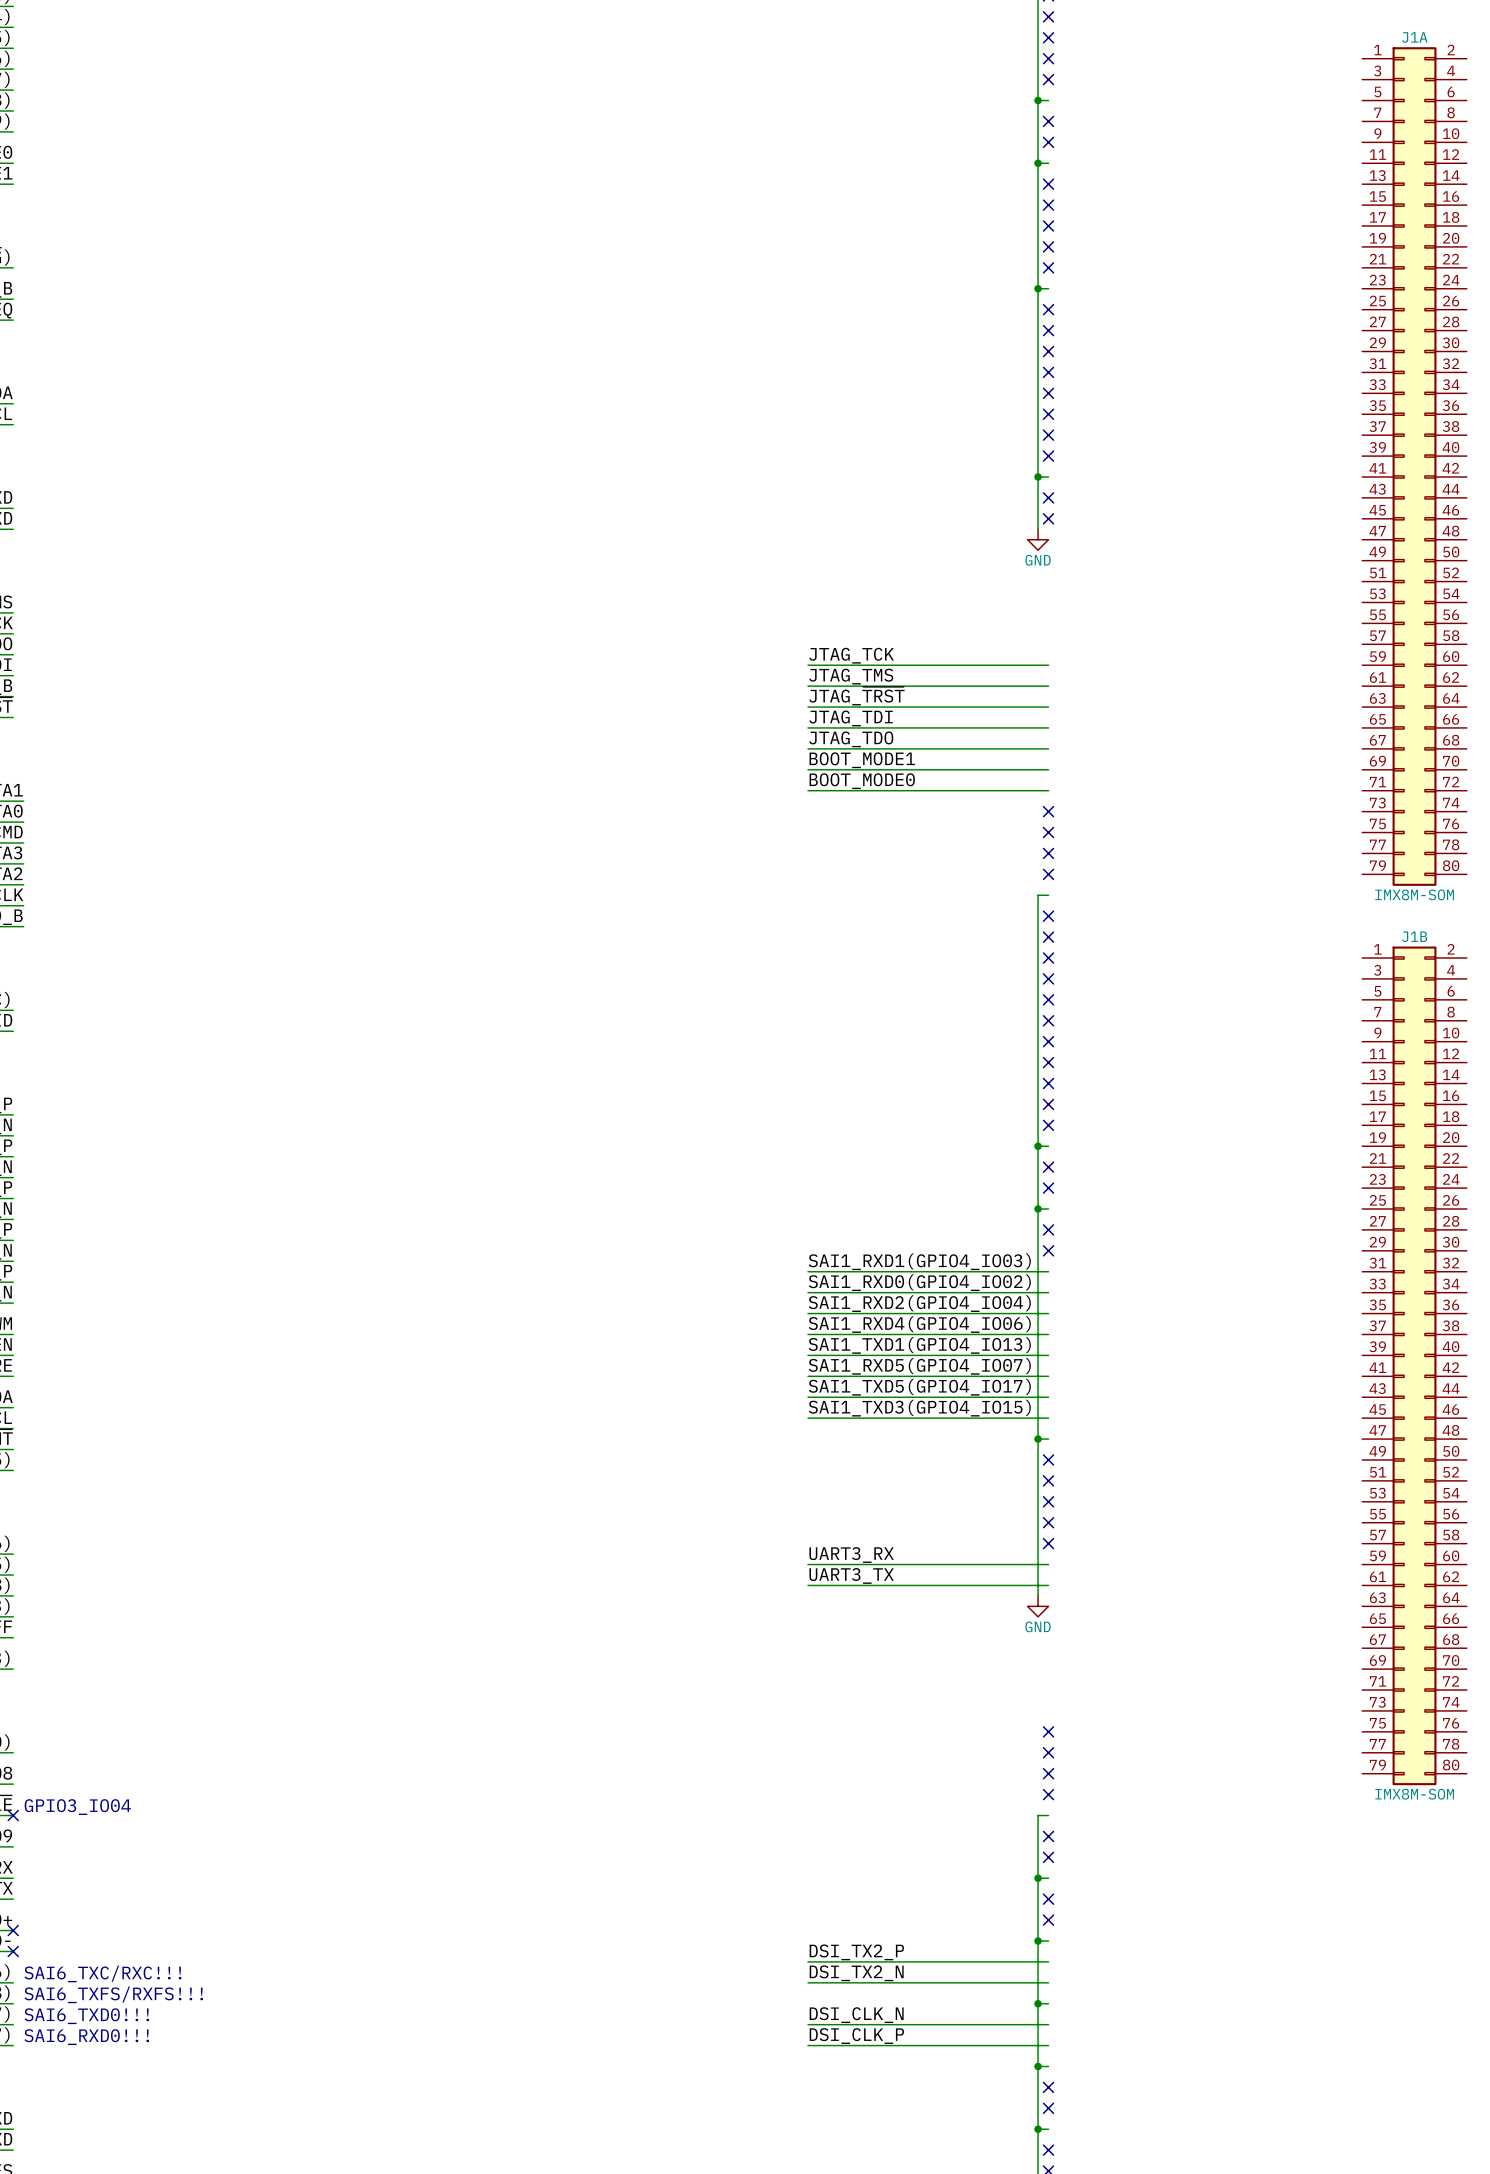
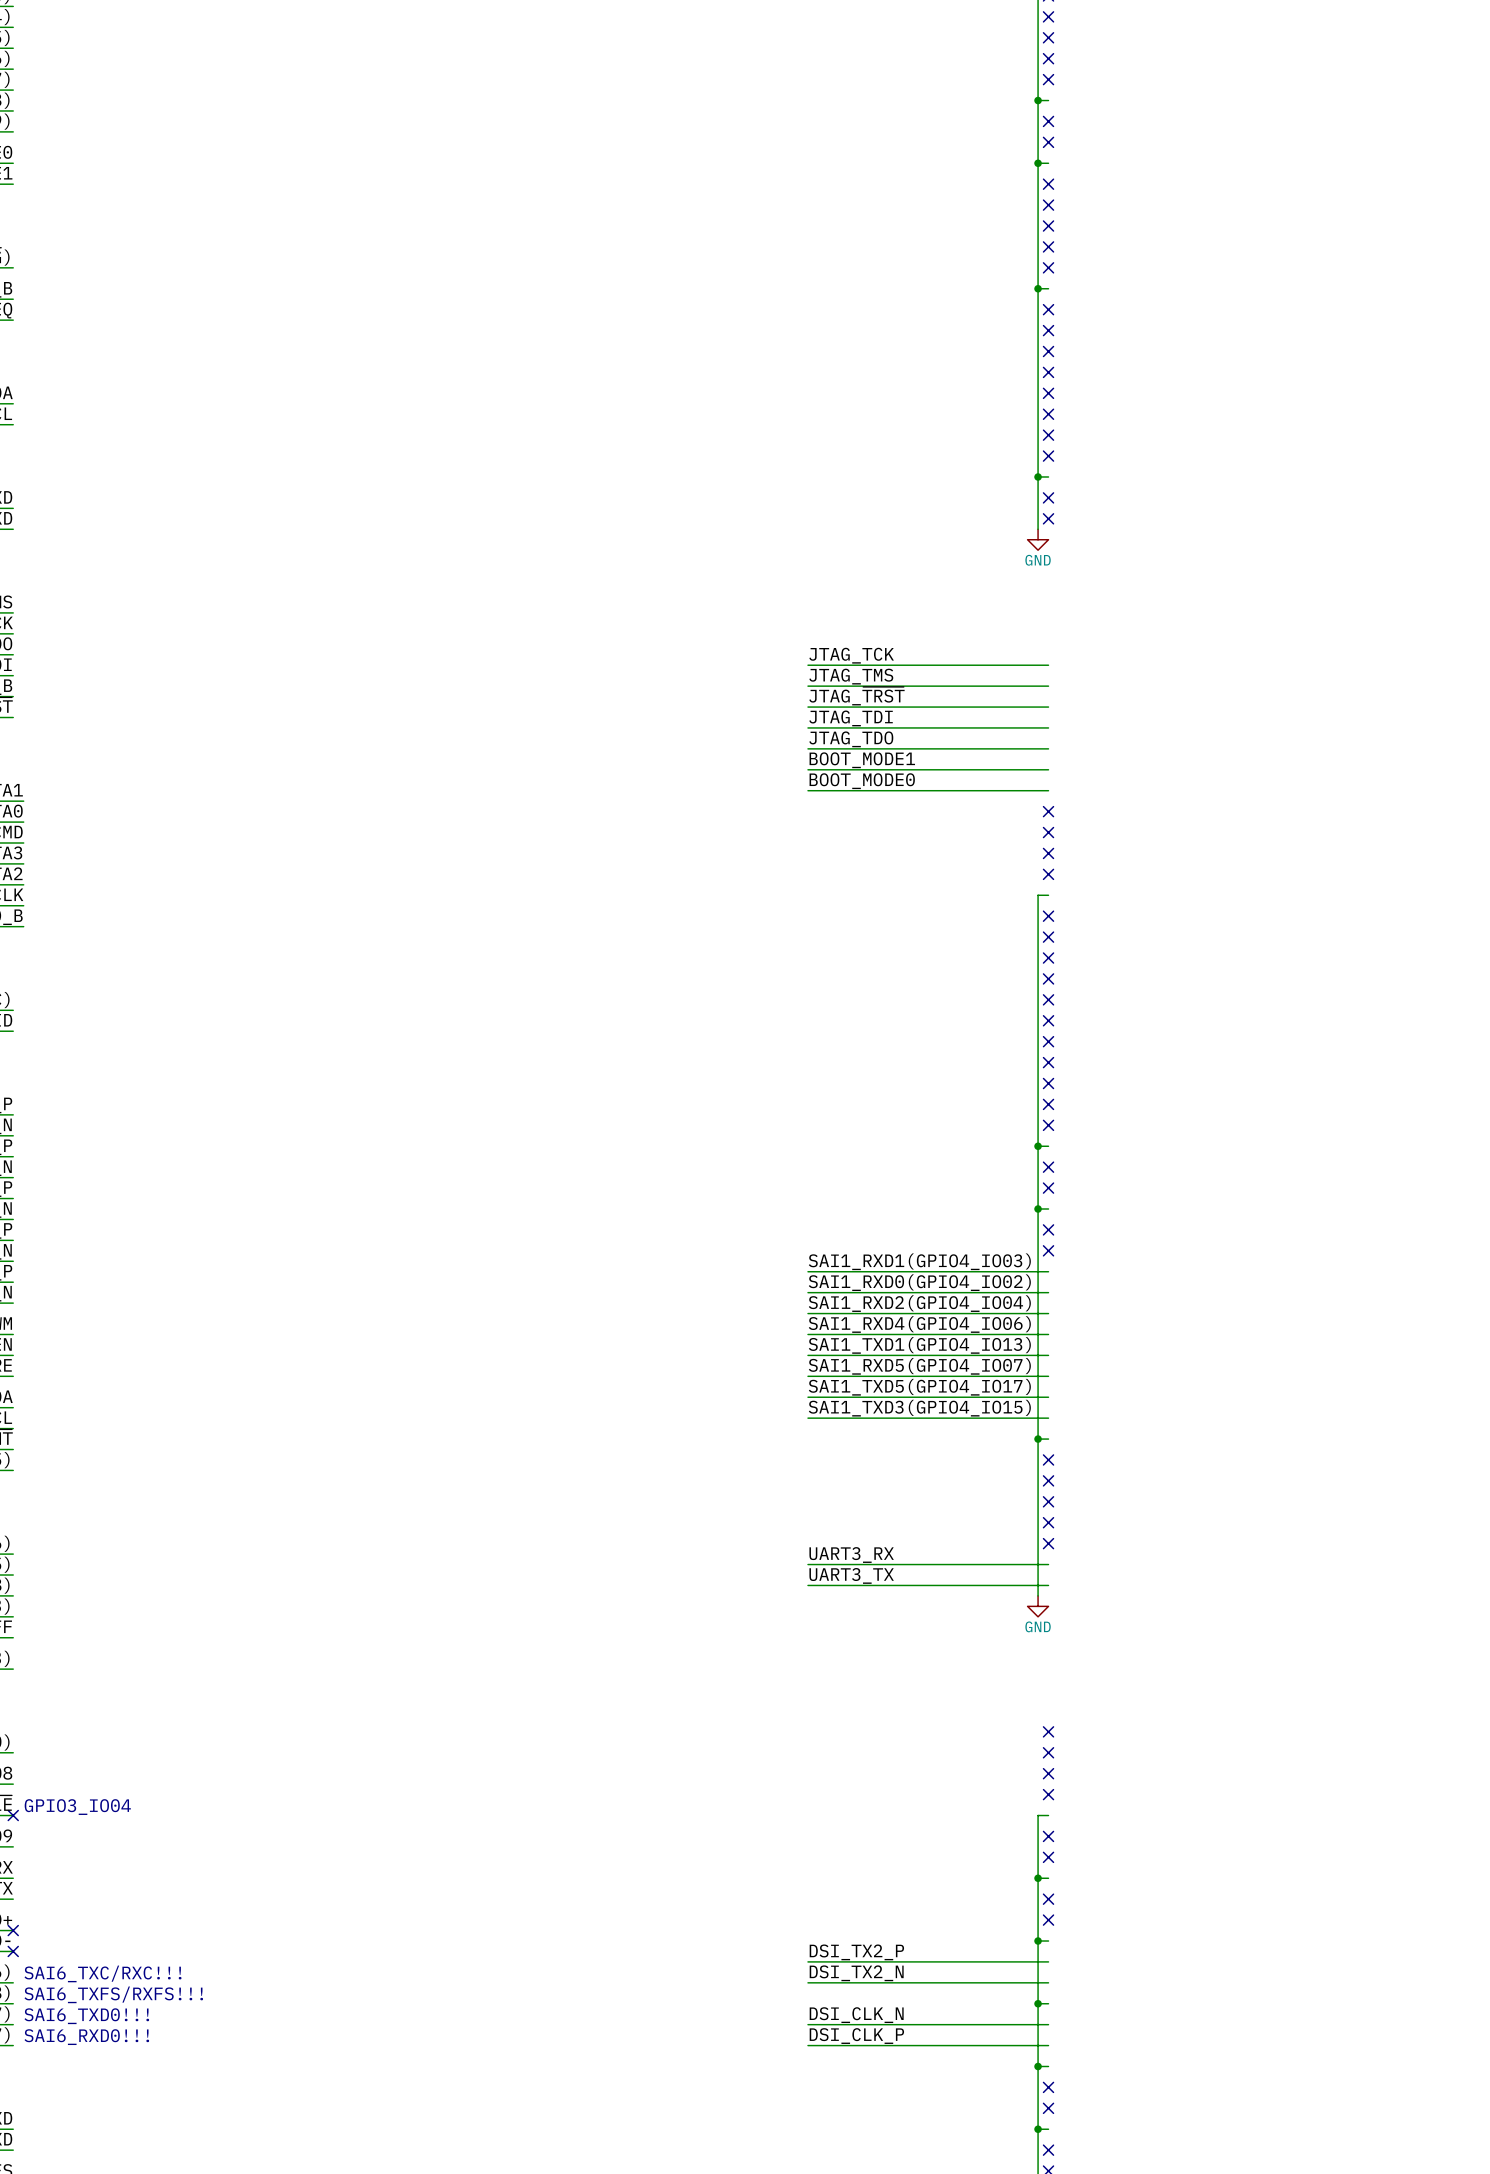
J1A: IMX8M-SOM (1414, 466) -> none
J1B: IMX8M-SOM (1414, 1365) -> none

